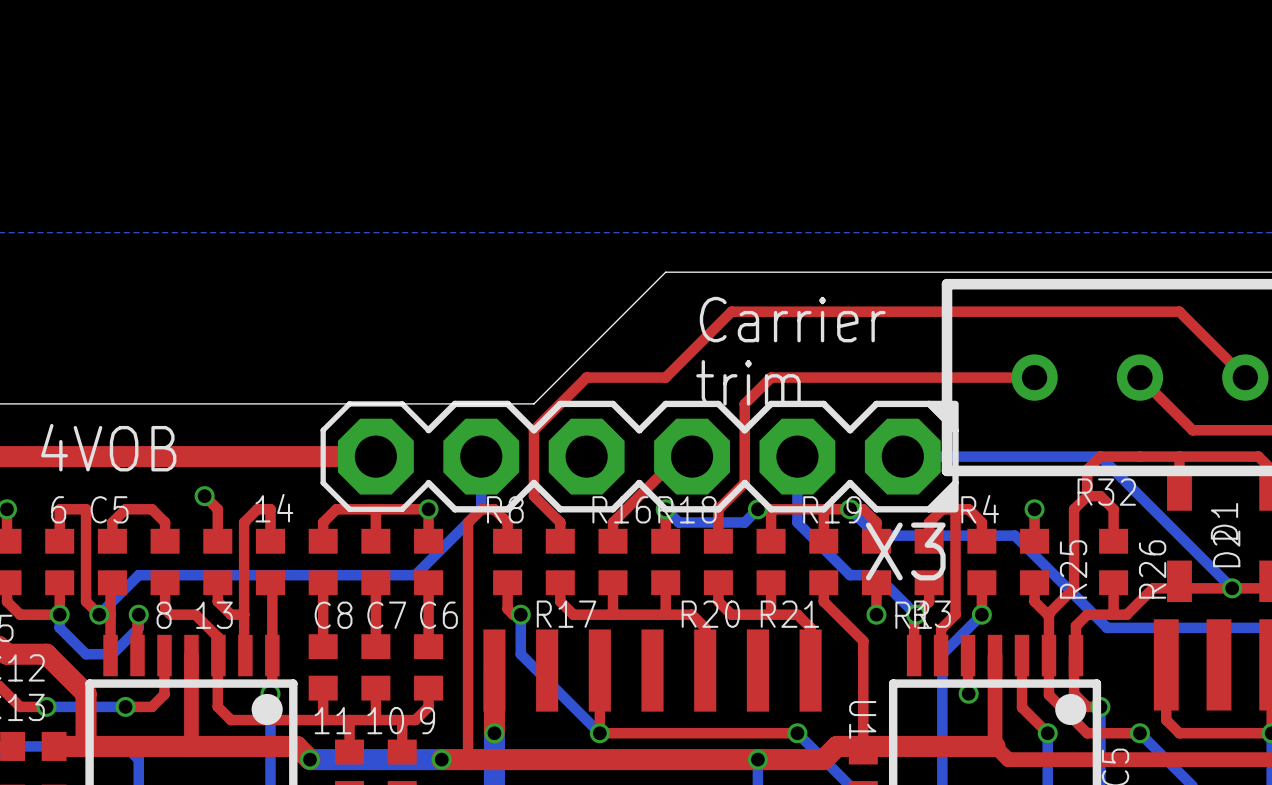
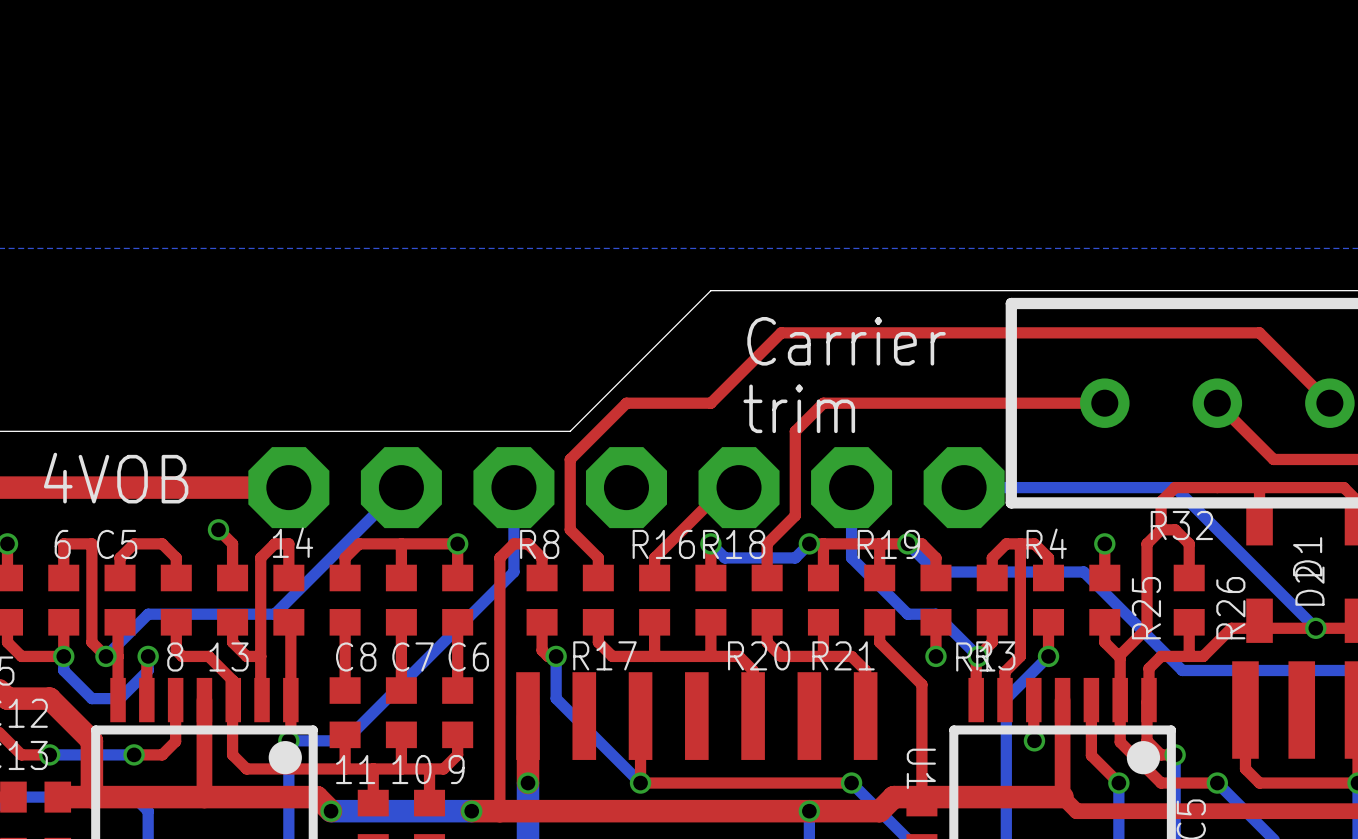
top track: (270, 456) (375, 456) -> none
part: none -> (626, 487)
X3: (639, 456) -> none
bottom track: (481, 509) (415, 575) (257, 575) -> (401, 487) (274, 614)
bottom track: none -> (513, 543) (513, 572) (345, 740) (288, 740)

